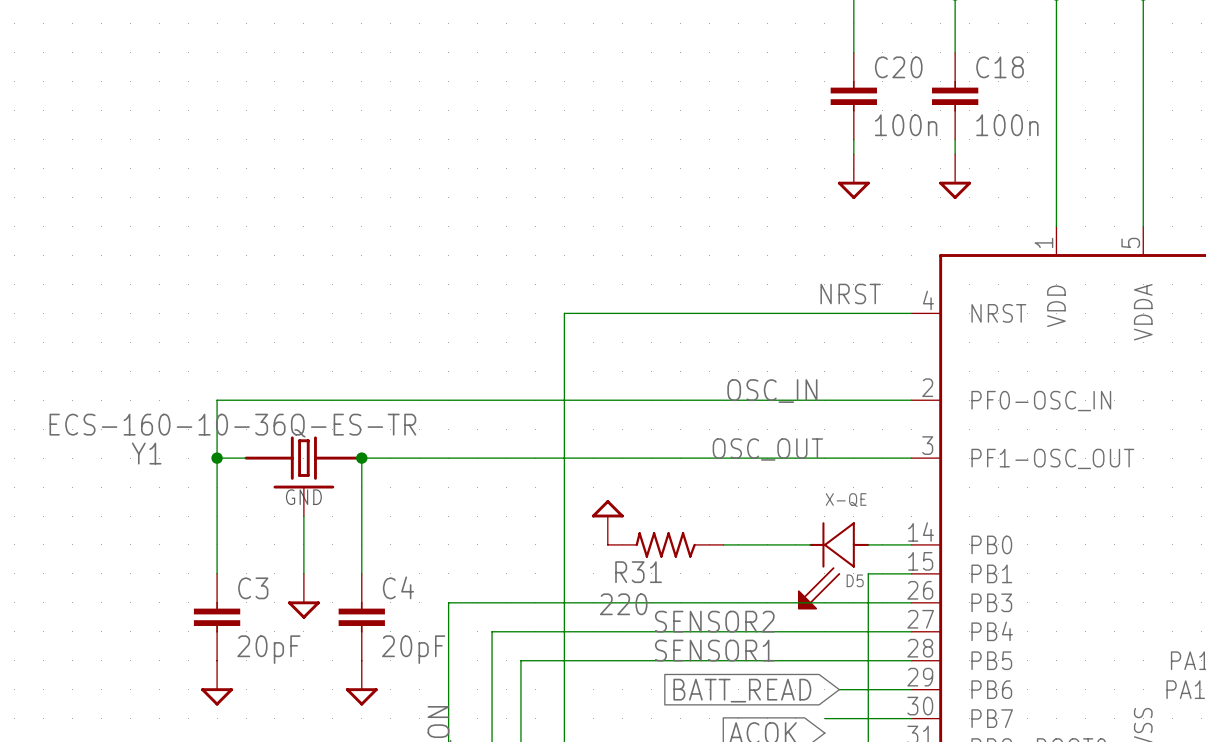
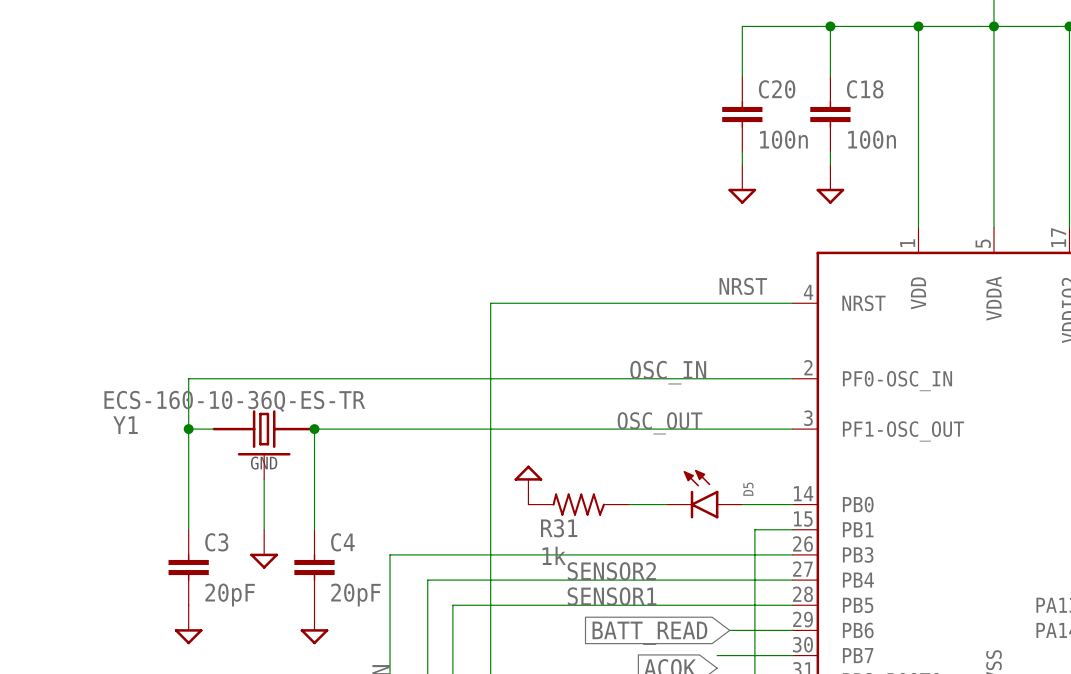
D5 value: X-QE (846, 500) -> none
D5 symbol: [797, 522, 870, 610] -> [666, 469, 743, 519]
D5 name position: D5 (855, 580) -> D5 (748, 489)
R31 value: 220 (623, 604) -> 1k (554, 555)

